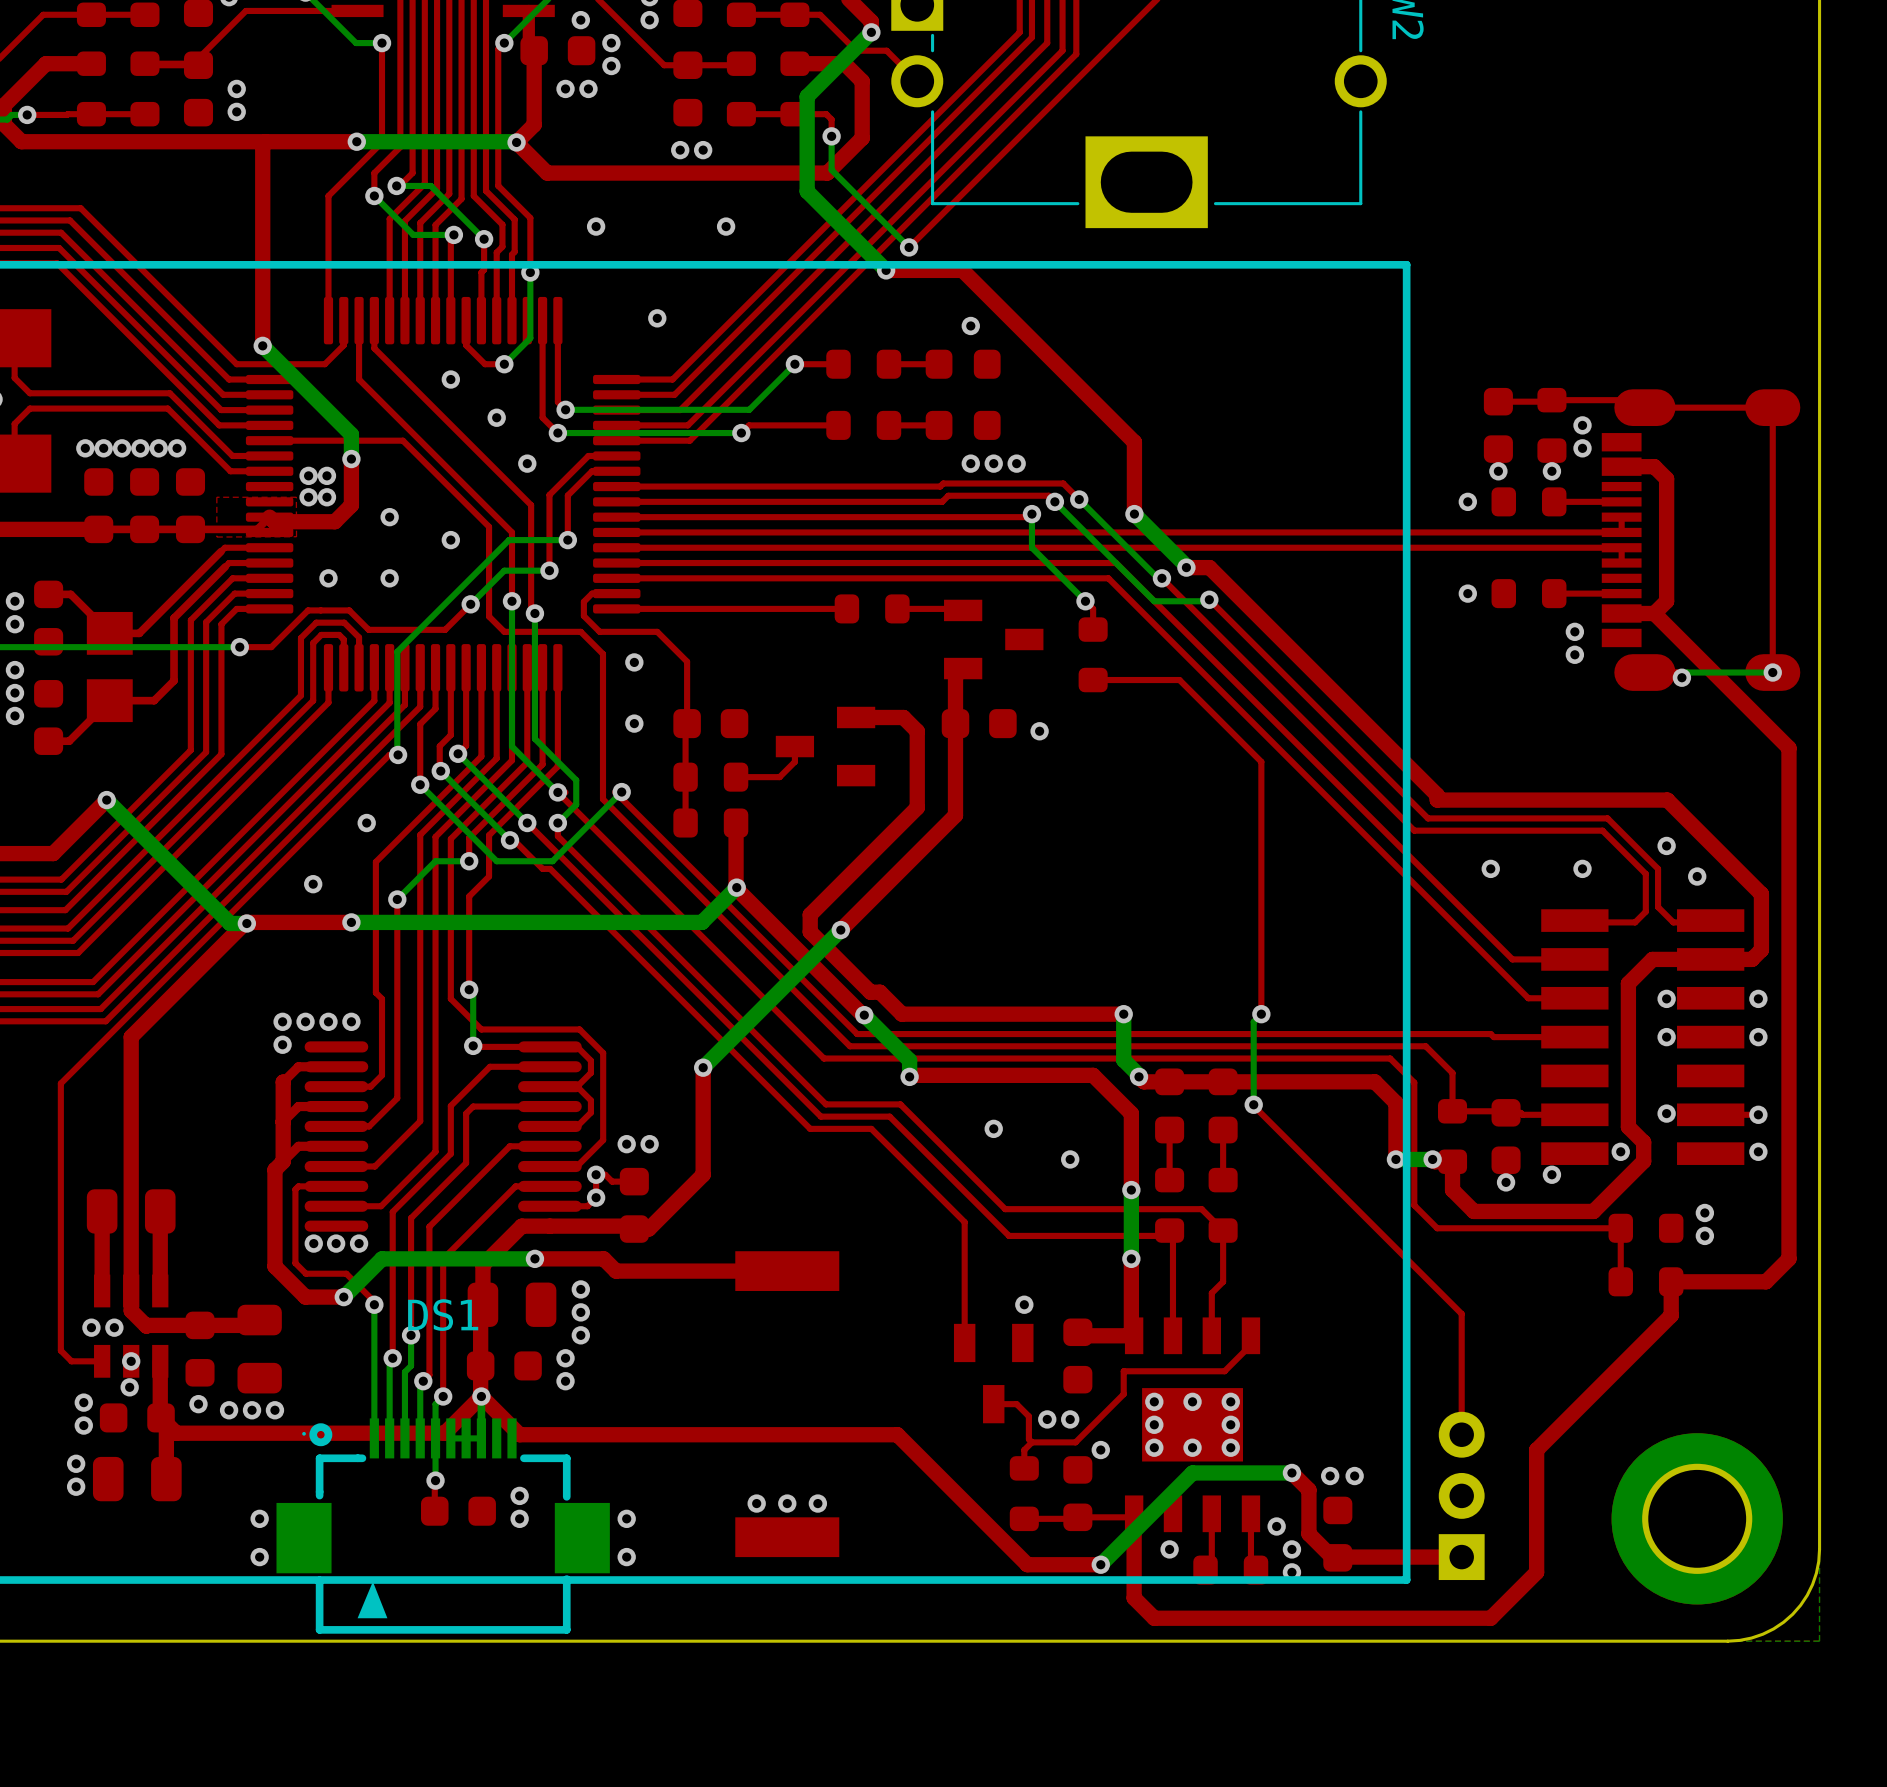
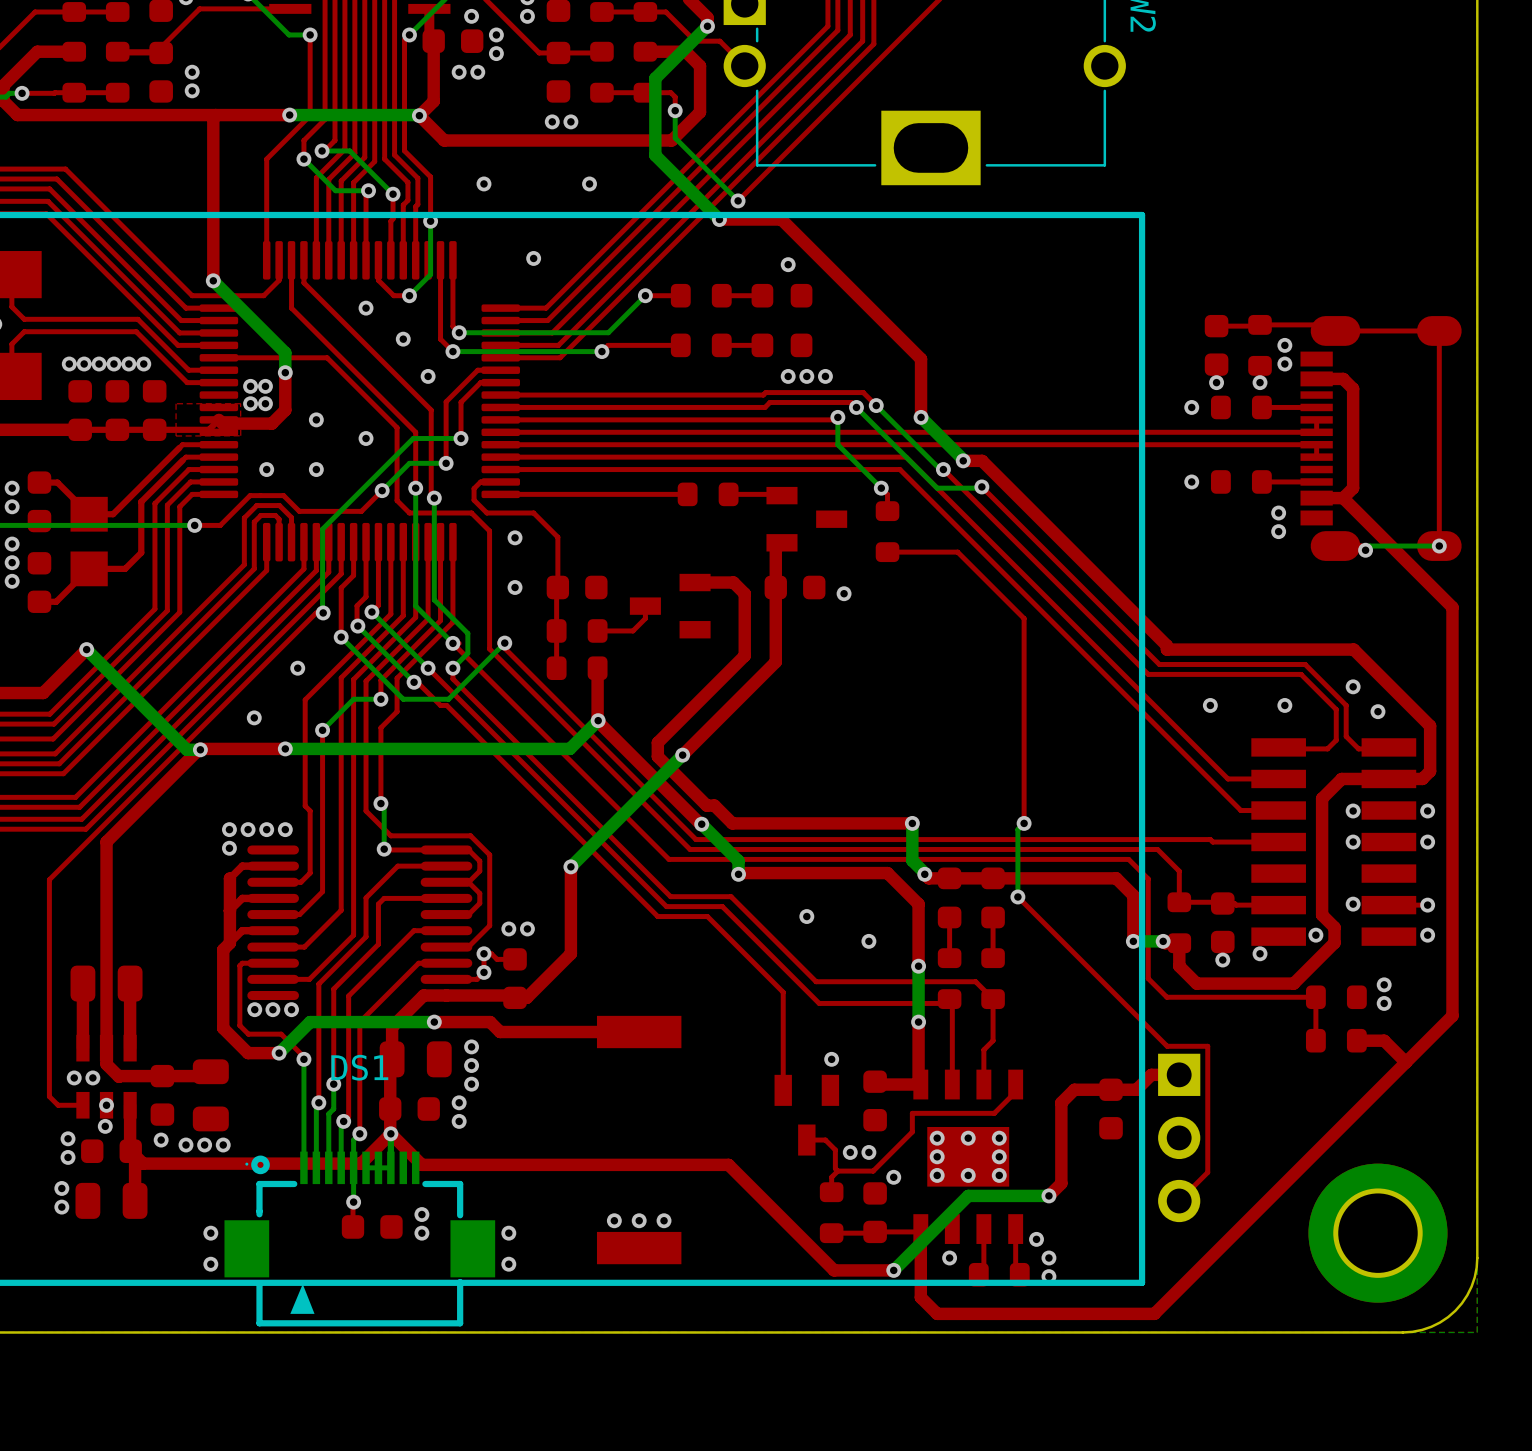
top track: (1253, 1104) (1461, 1313) (1461, 1434) -> (1017, 896) (1167, 1046) (1207, 1046) (1207, 1172) (1179, 1201)
top track: (1788, 1251) (1788, 1258) (1766, 1281) (1704, 1281) -> (1405, 1062) (1384, 1040)
top track: (1671, 1281) (1671, 1315) (1536, 1450) (1536, 1572) (1490, 1618) (1421, 1618) -> (1452, 1015) (1154, 1313)
part: none -> (1179, 1137)
top track: (1291, 1472) (1308, 1489) (1308, 1533) (1332, 1557) (1461, 1557) -> (1048, 1195) (1061, 1183) (1061, 1102) (1074, 1089) (1136, 1089) (1151, 1074) (1179, 1074)
via: (1330, 1476) -> none
via: (1354, 1476) -> none
part: (1461, 1495) -> none
part position: (1337, 1534) -> (1111, 1109)

